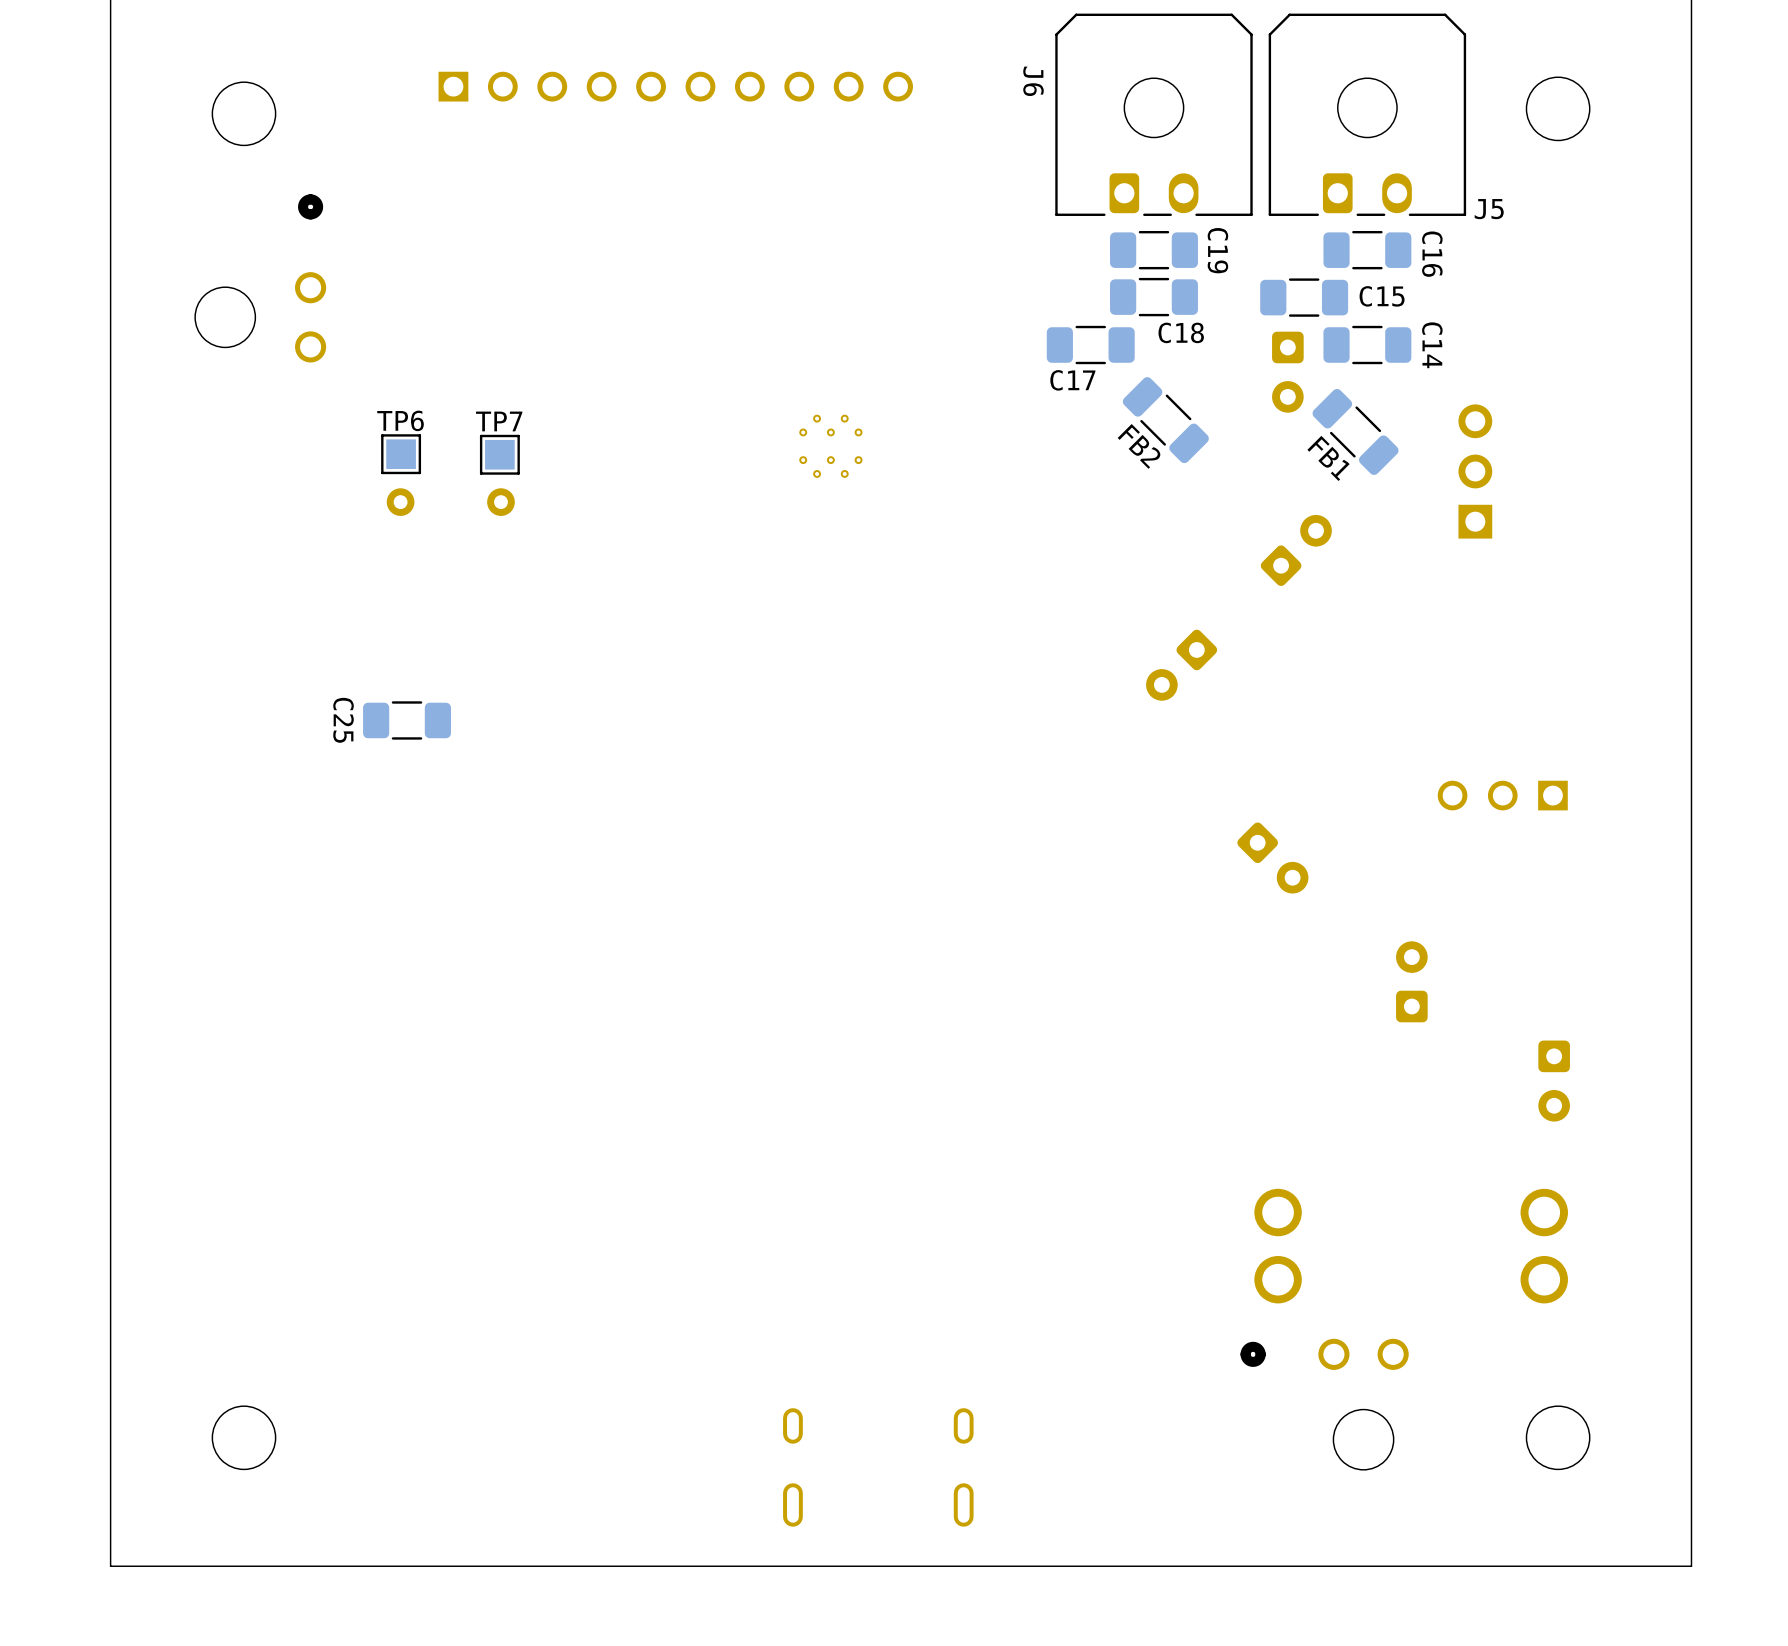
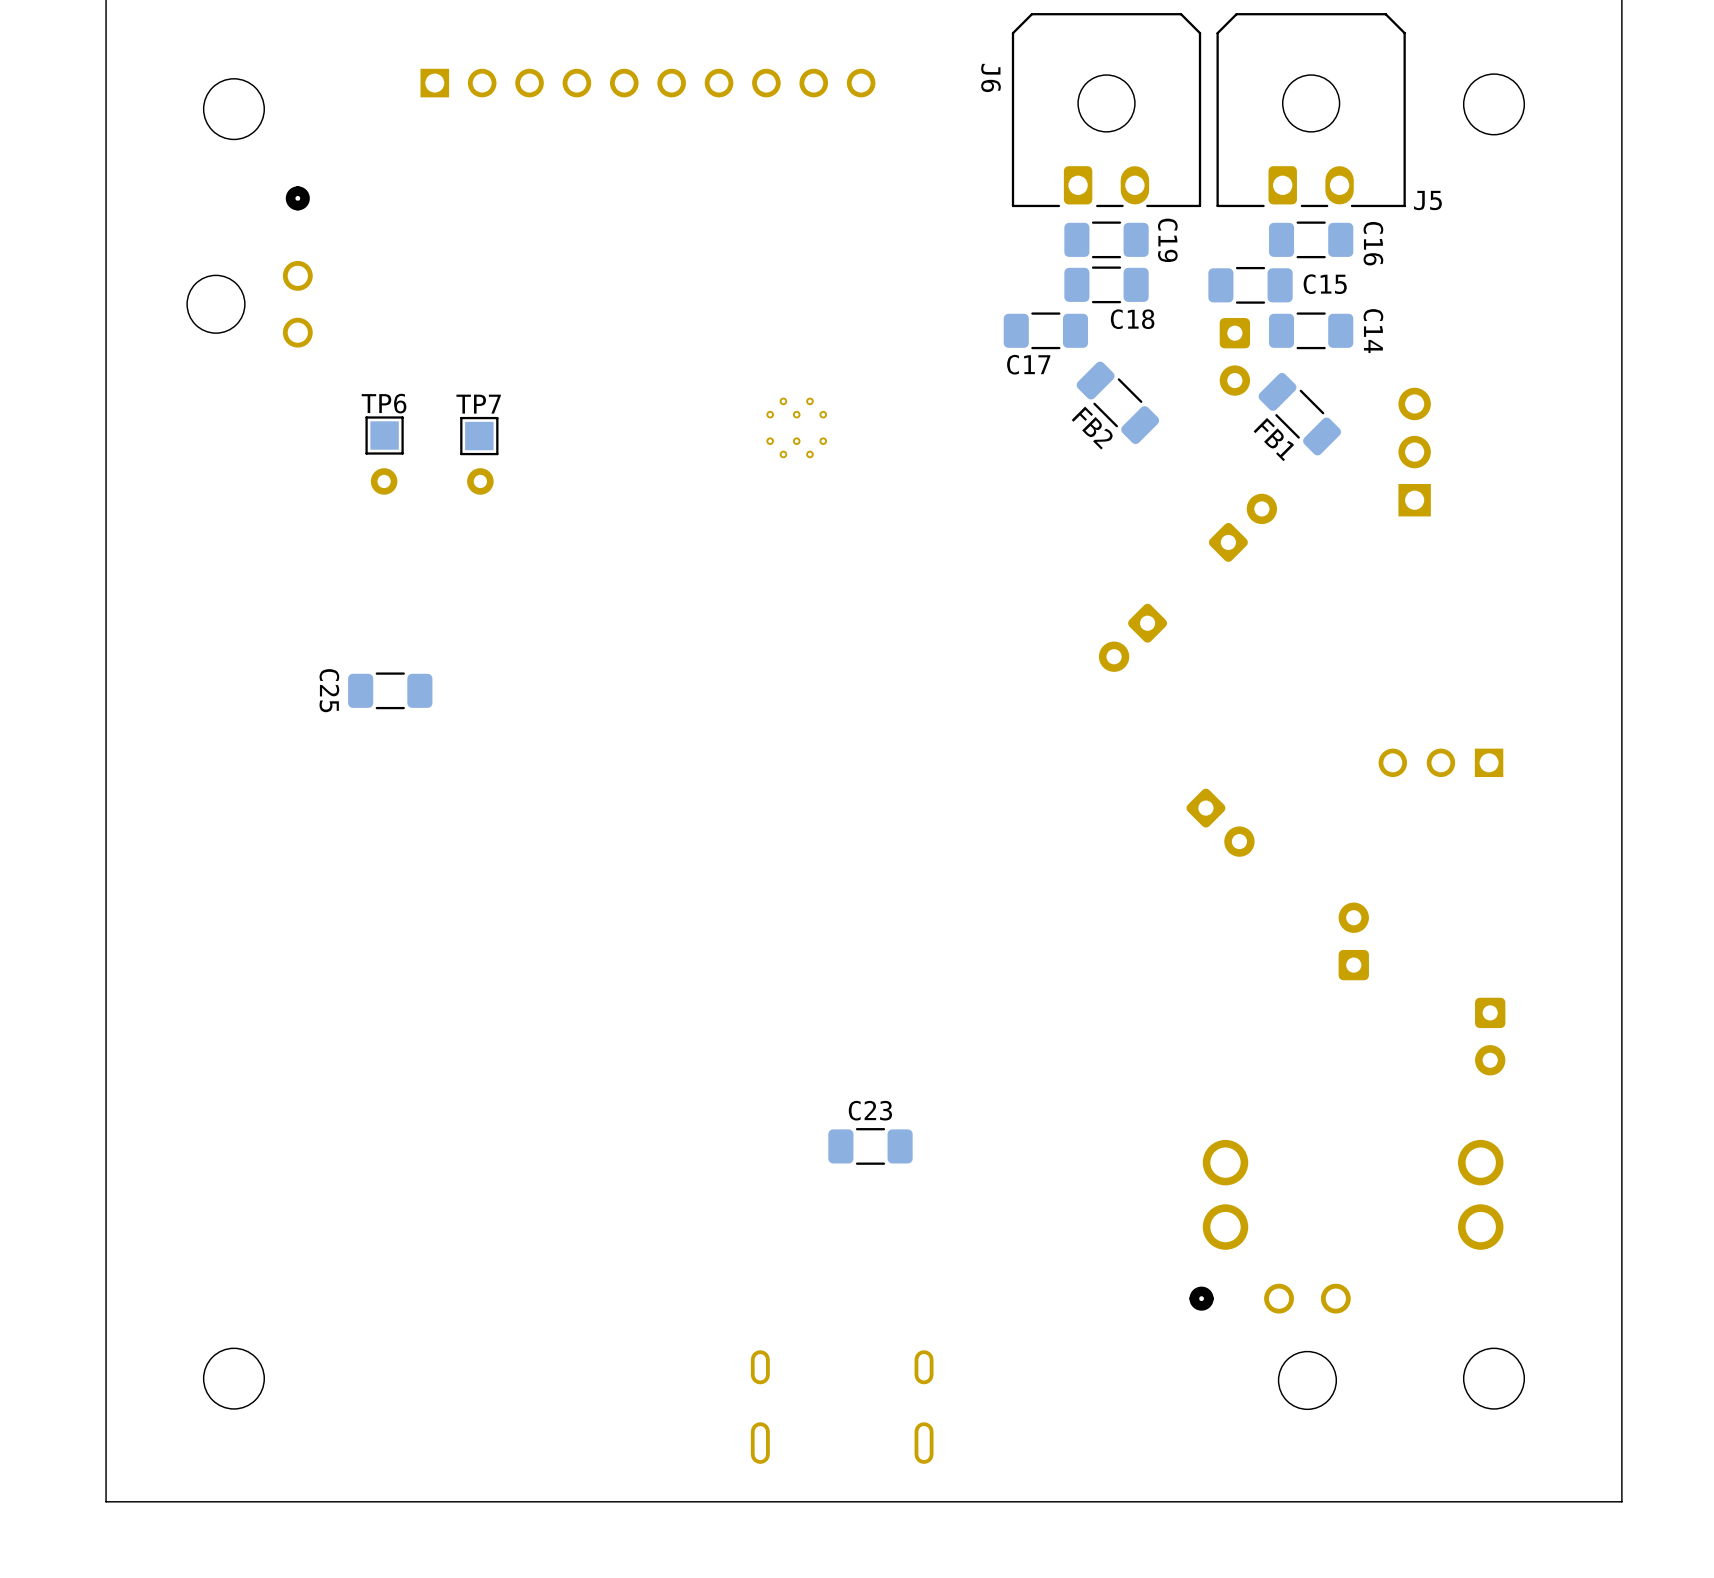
C23: none -> (870, 1146)

